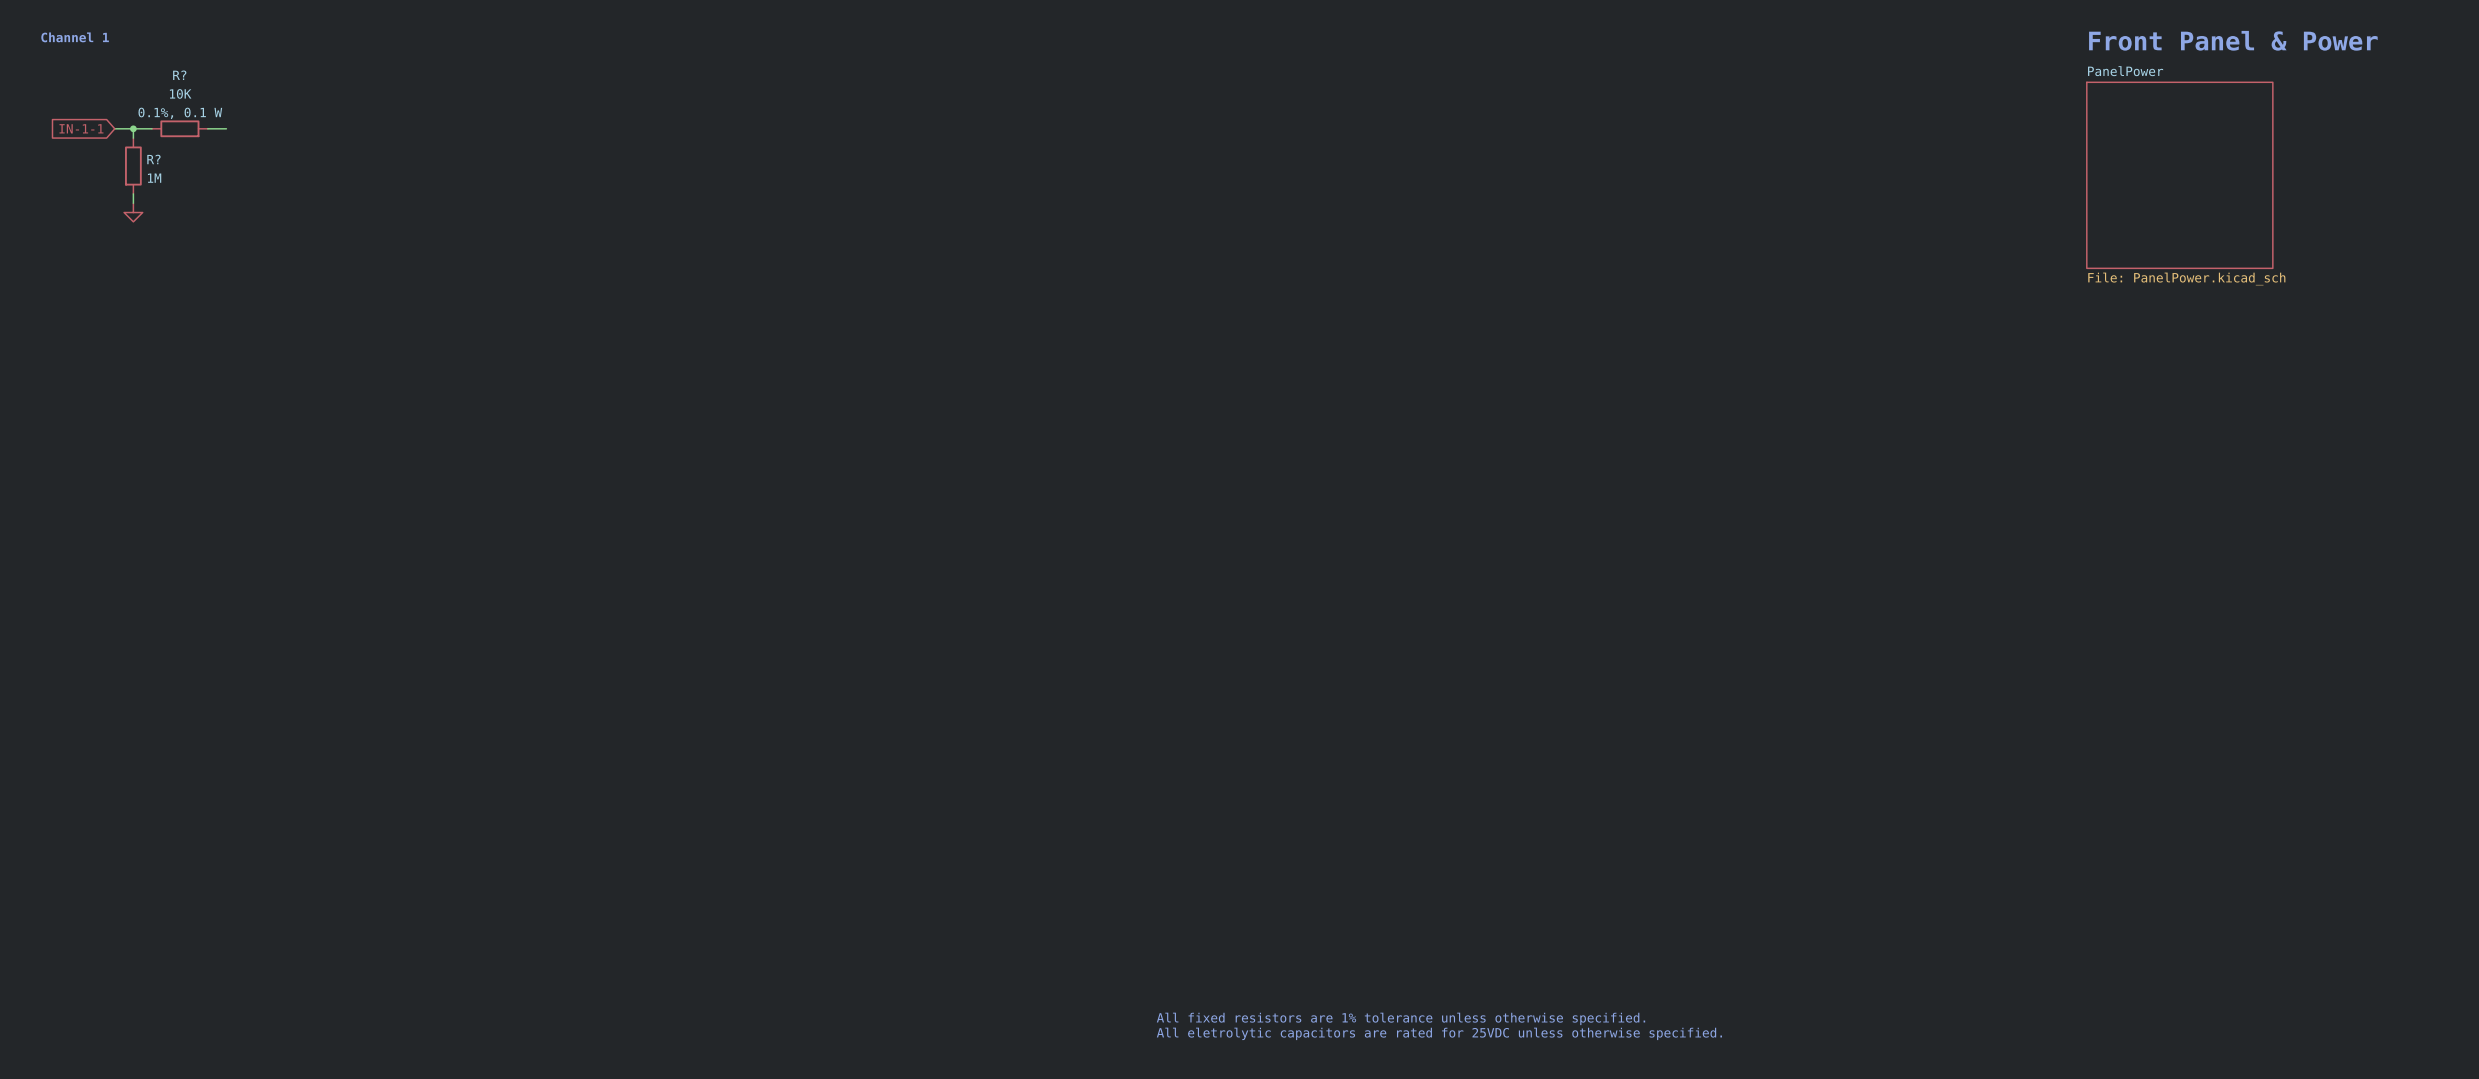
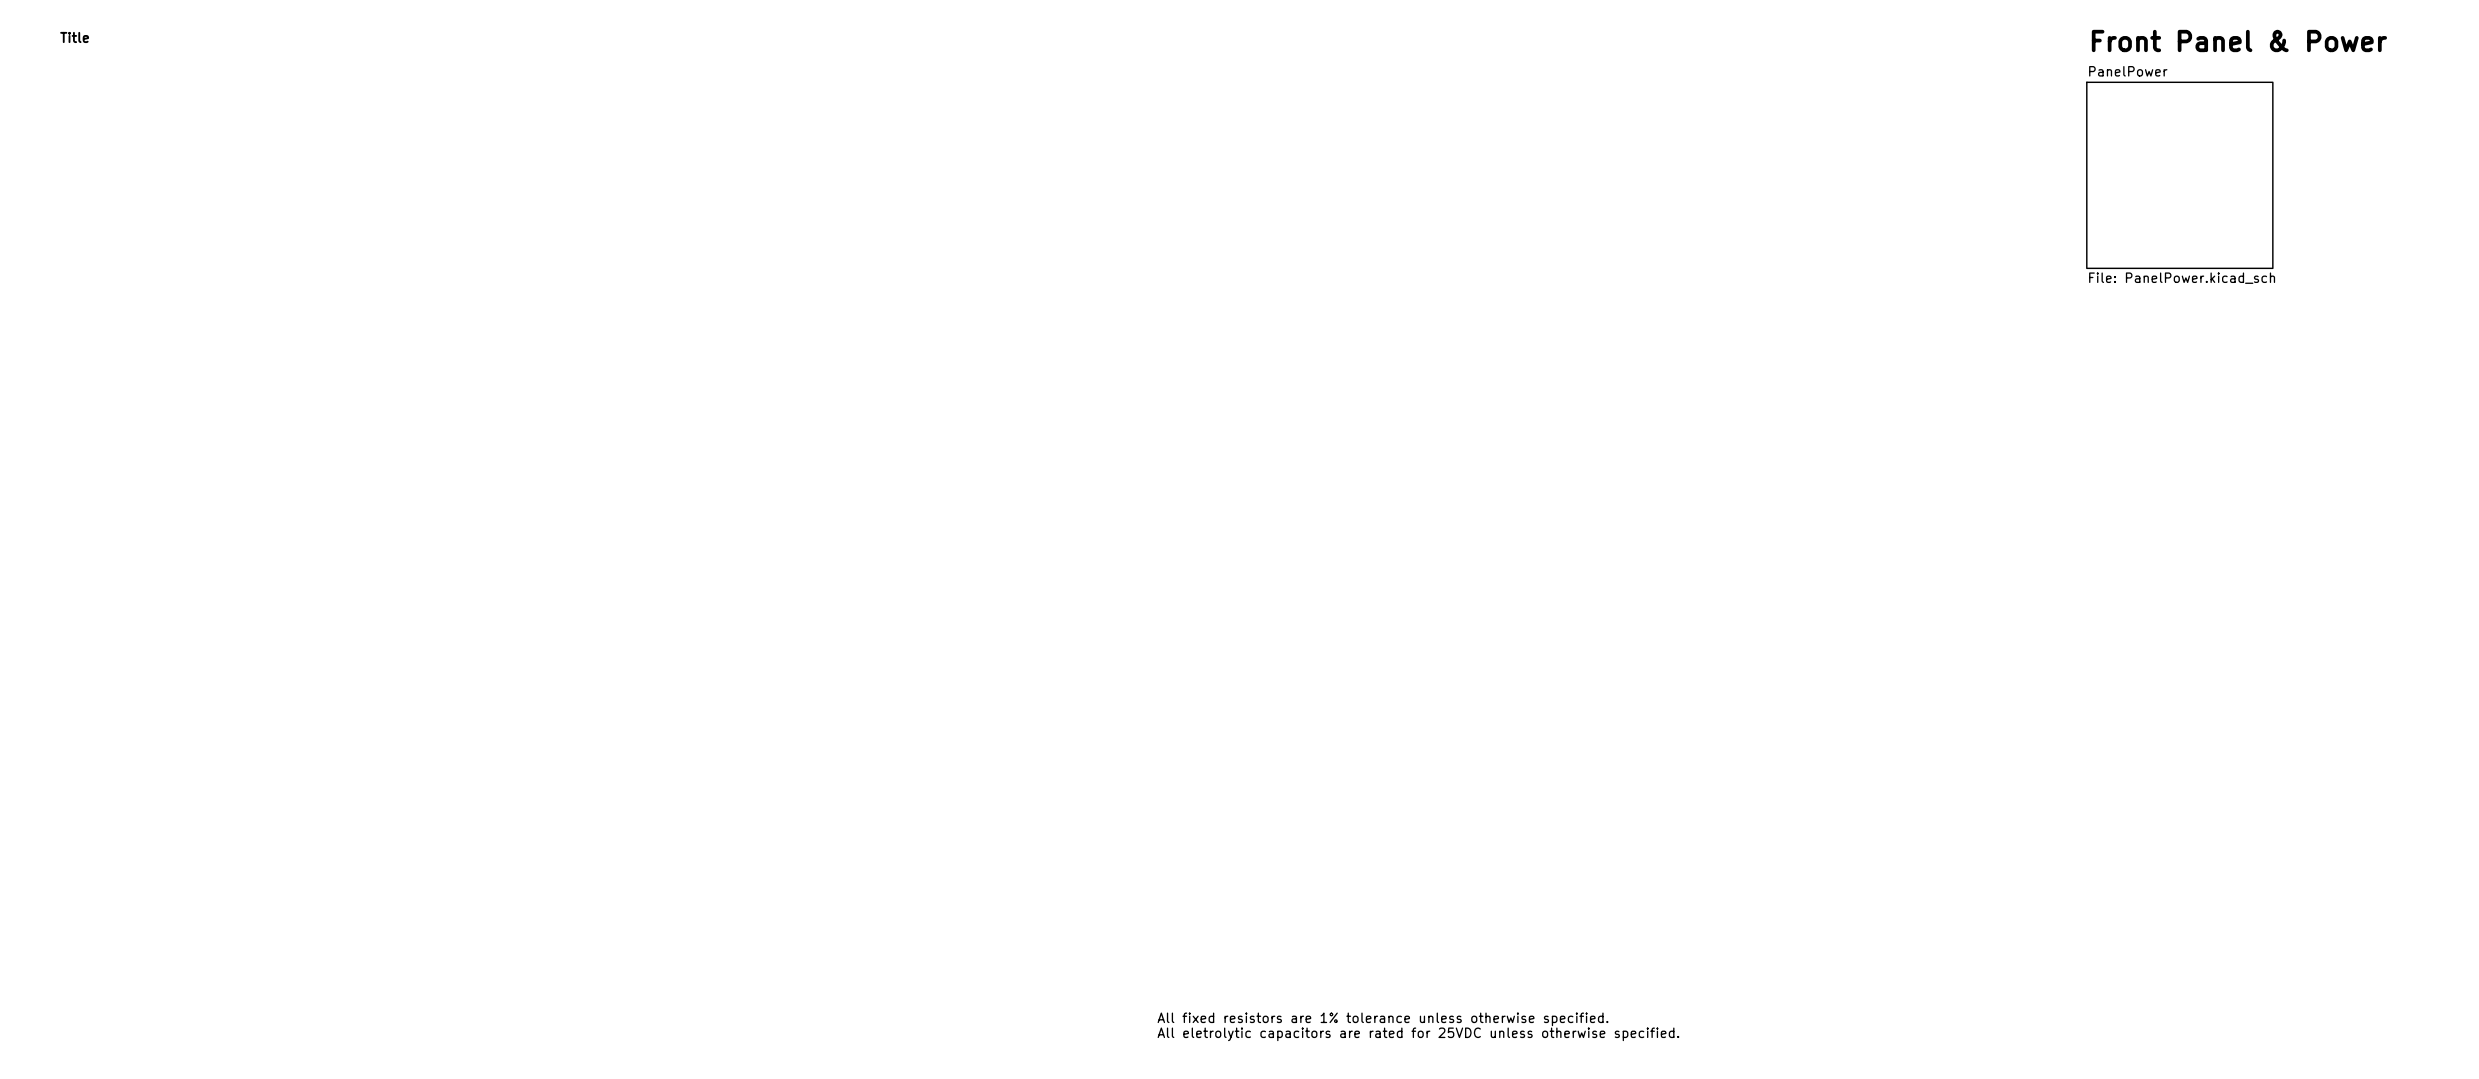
text: Channel 1 (75, 37) -> none
text: none -> Title (74, 37)
global label: IN-1-1 (81, 128) -> none
wire: (114, 128) (152, 128) -> none
wire: (133, 128) (133, 138) -> none
junction: (133, 128) -> none
R?: 10K (179, 128) -> none
wire: (207, 128) (226, 128) -> none
R?: 1M (133, 166) -> none
wire: (133, 193) (133, 203) -> none
power symbol: (133, 212) -> none

